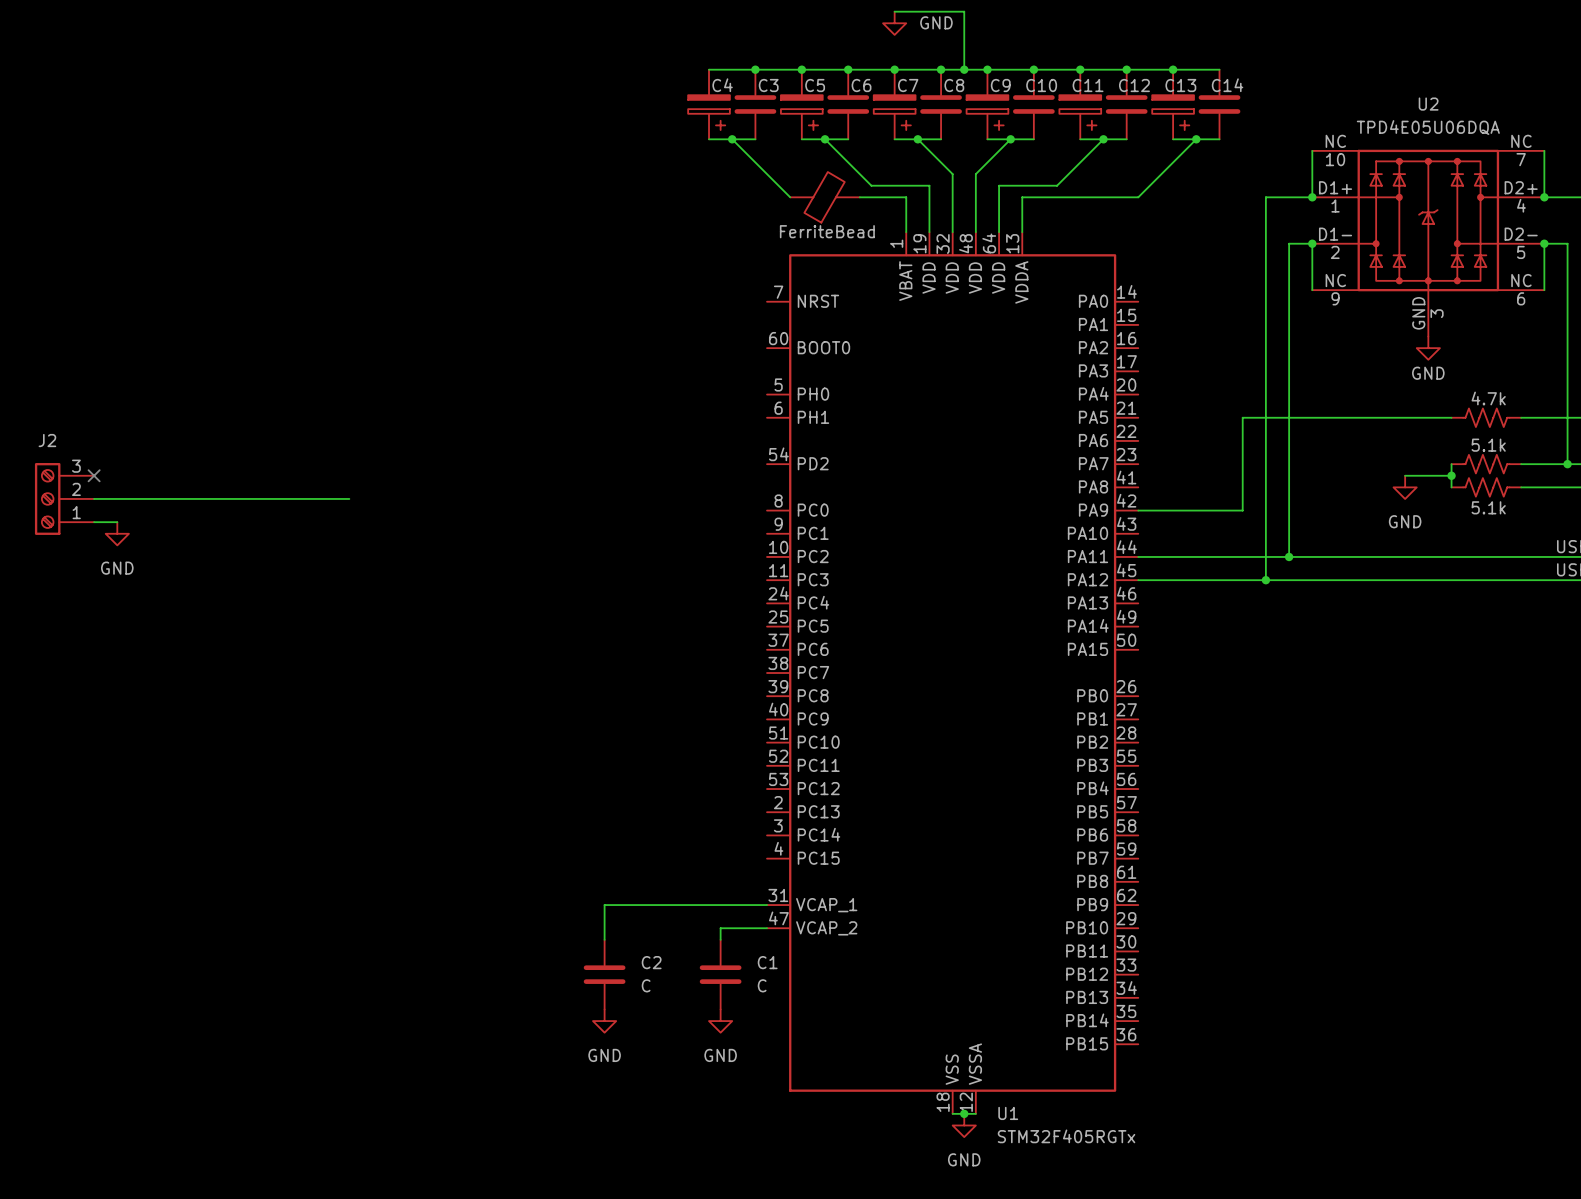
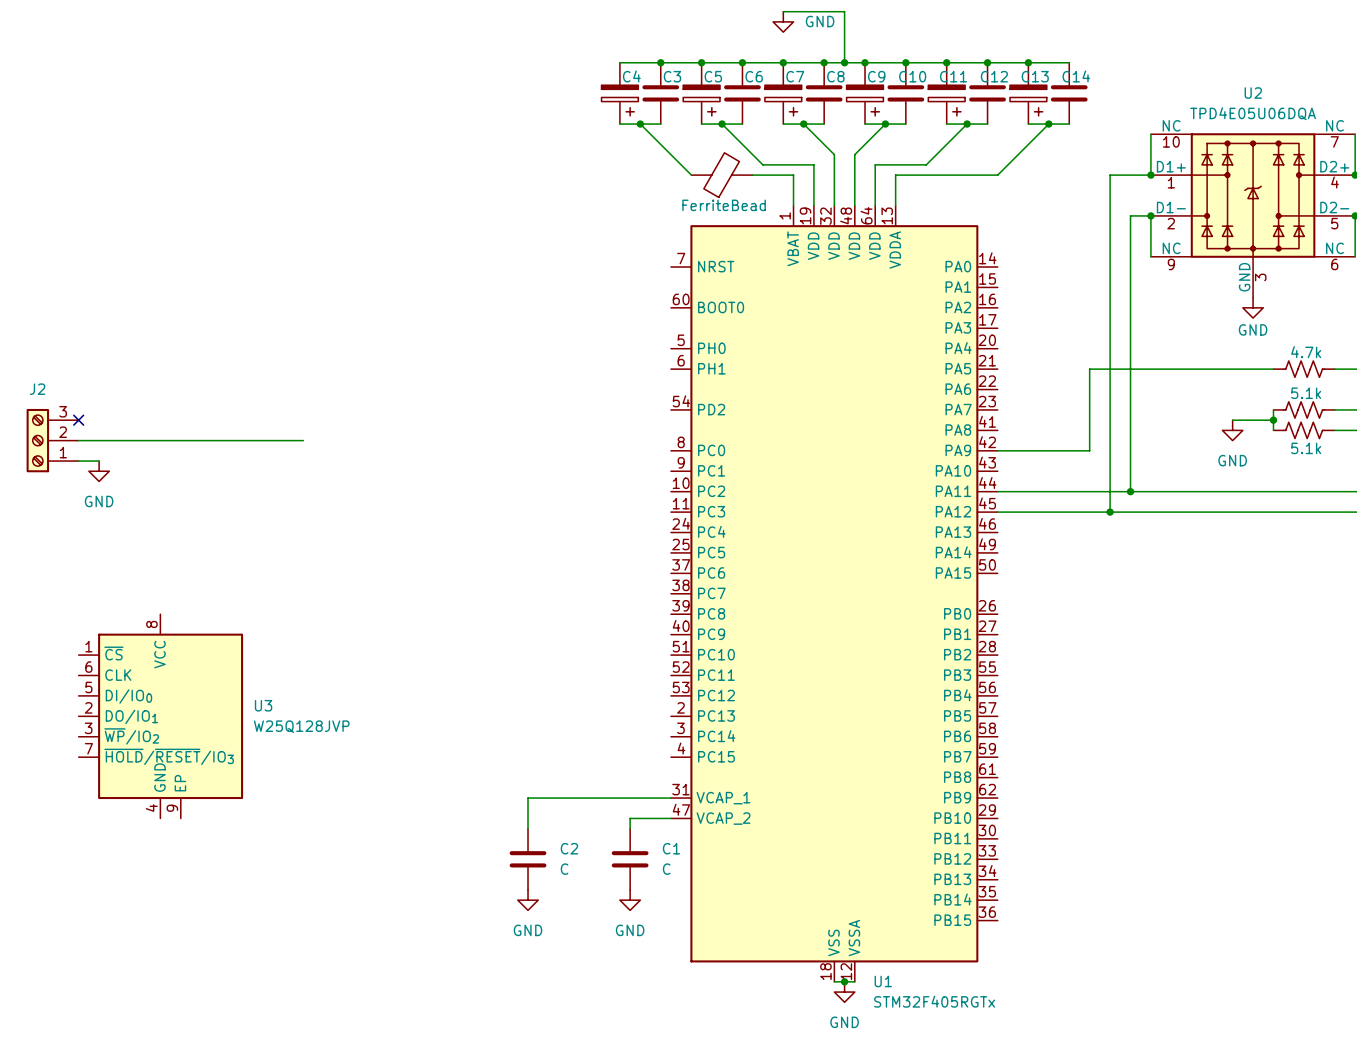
U3: none -> W25Q128JVP (160, 716)

